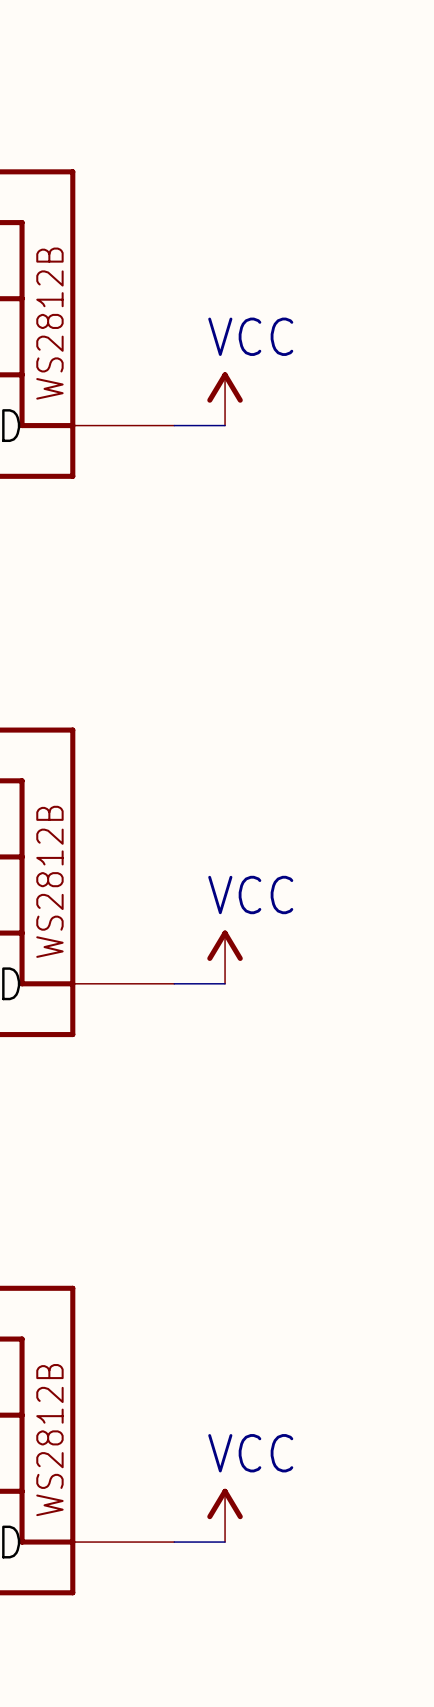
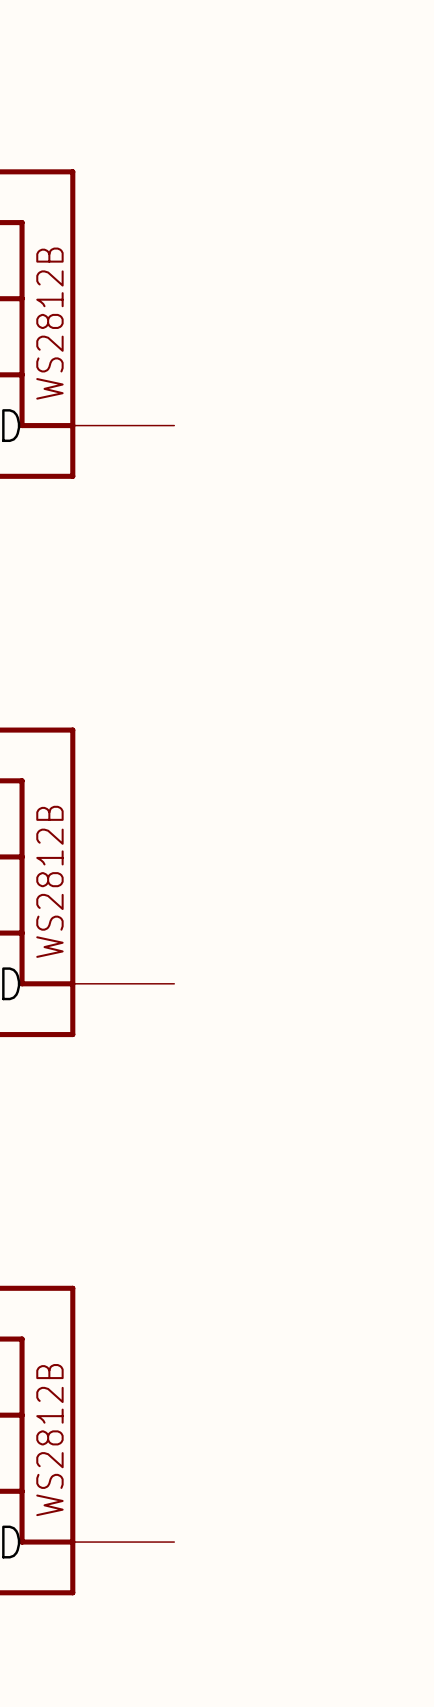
power symbol: VCC (225, 398) -> none
wire: (174, 425) (225, 425) -> none
power symbol: VCC (225, 957) -> none
wire: (174, 983) (225, 983) -> none
power symbol: VCC (225, 1515) -> none
wire: (174, 1542) (225, 1542) -> none

